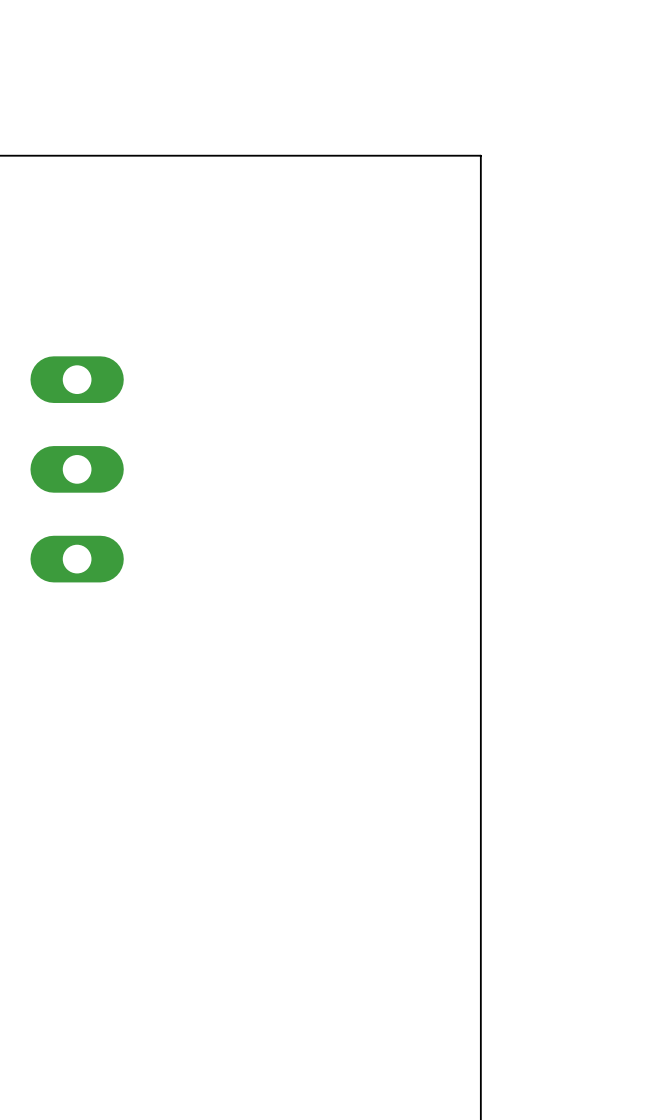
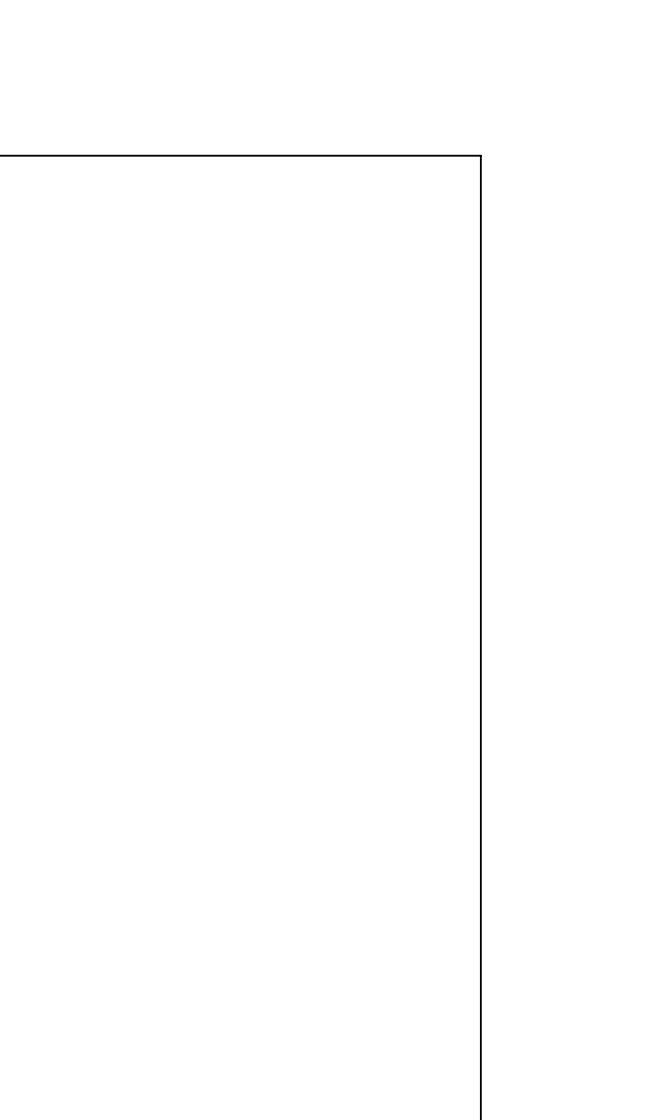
part: (77, 469) -> none

